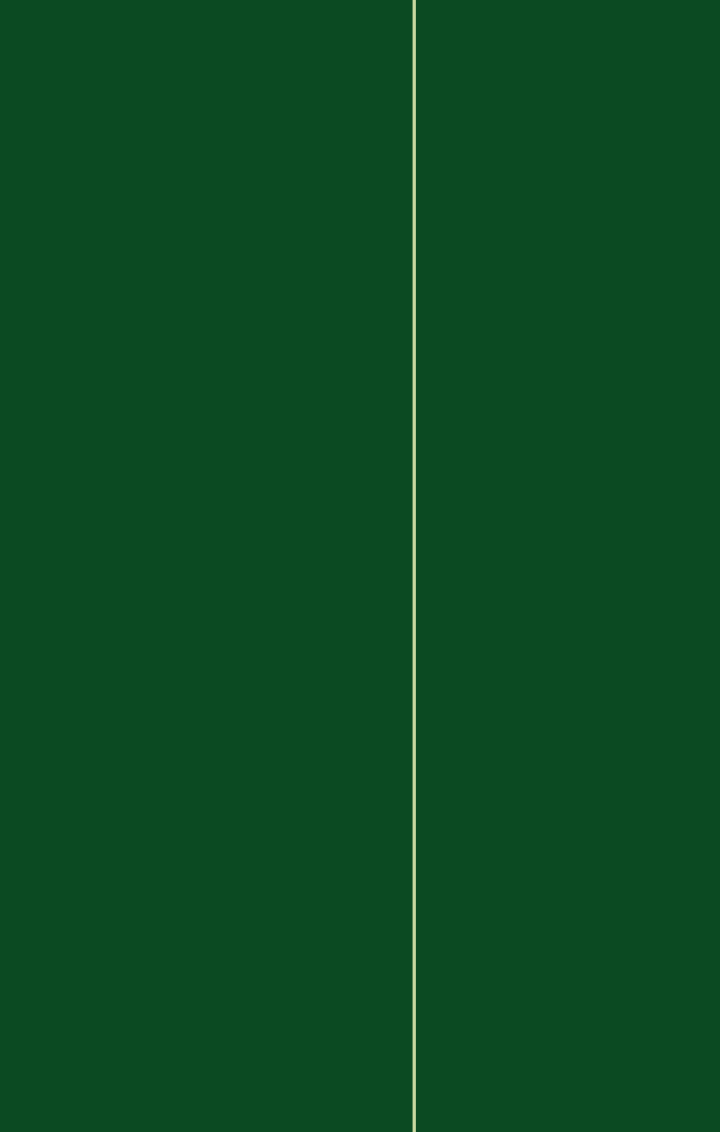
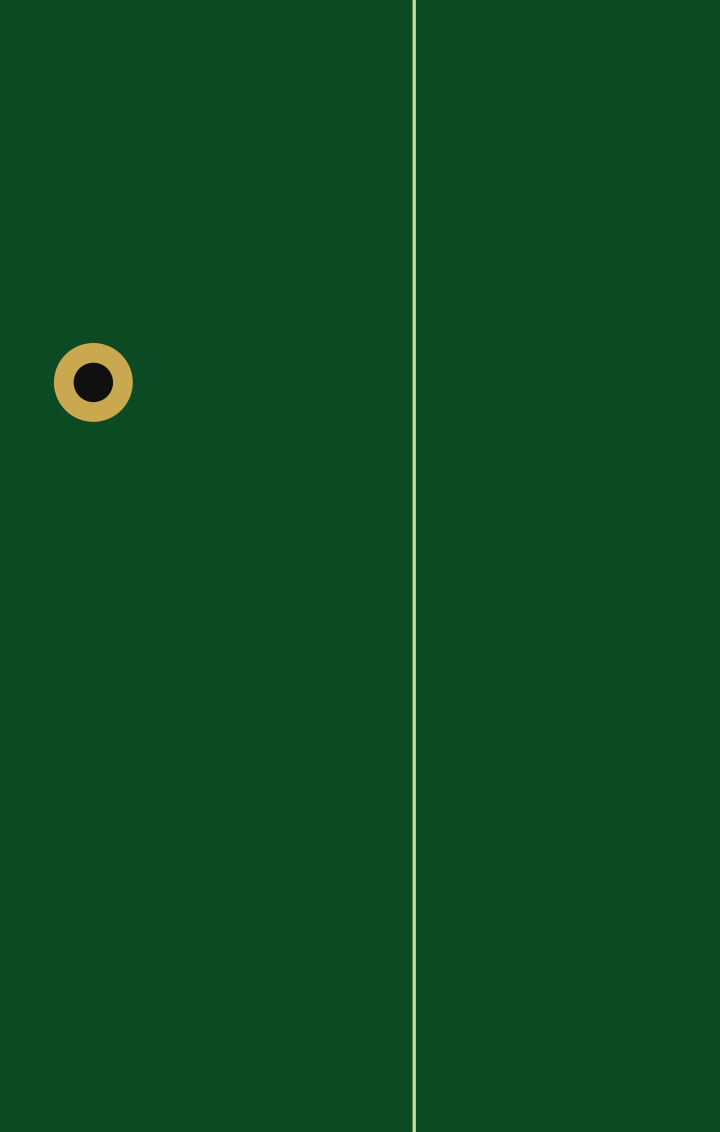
via: none -> (93, 382)

